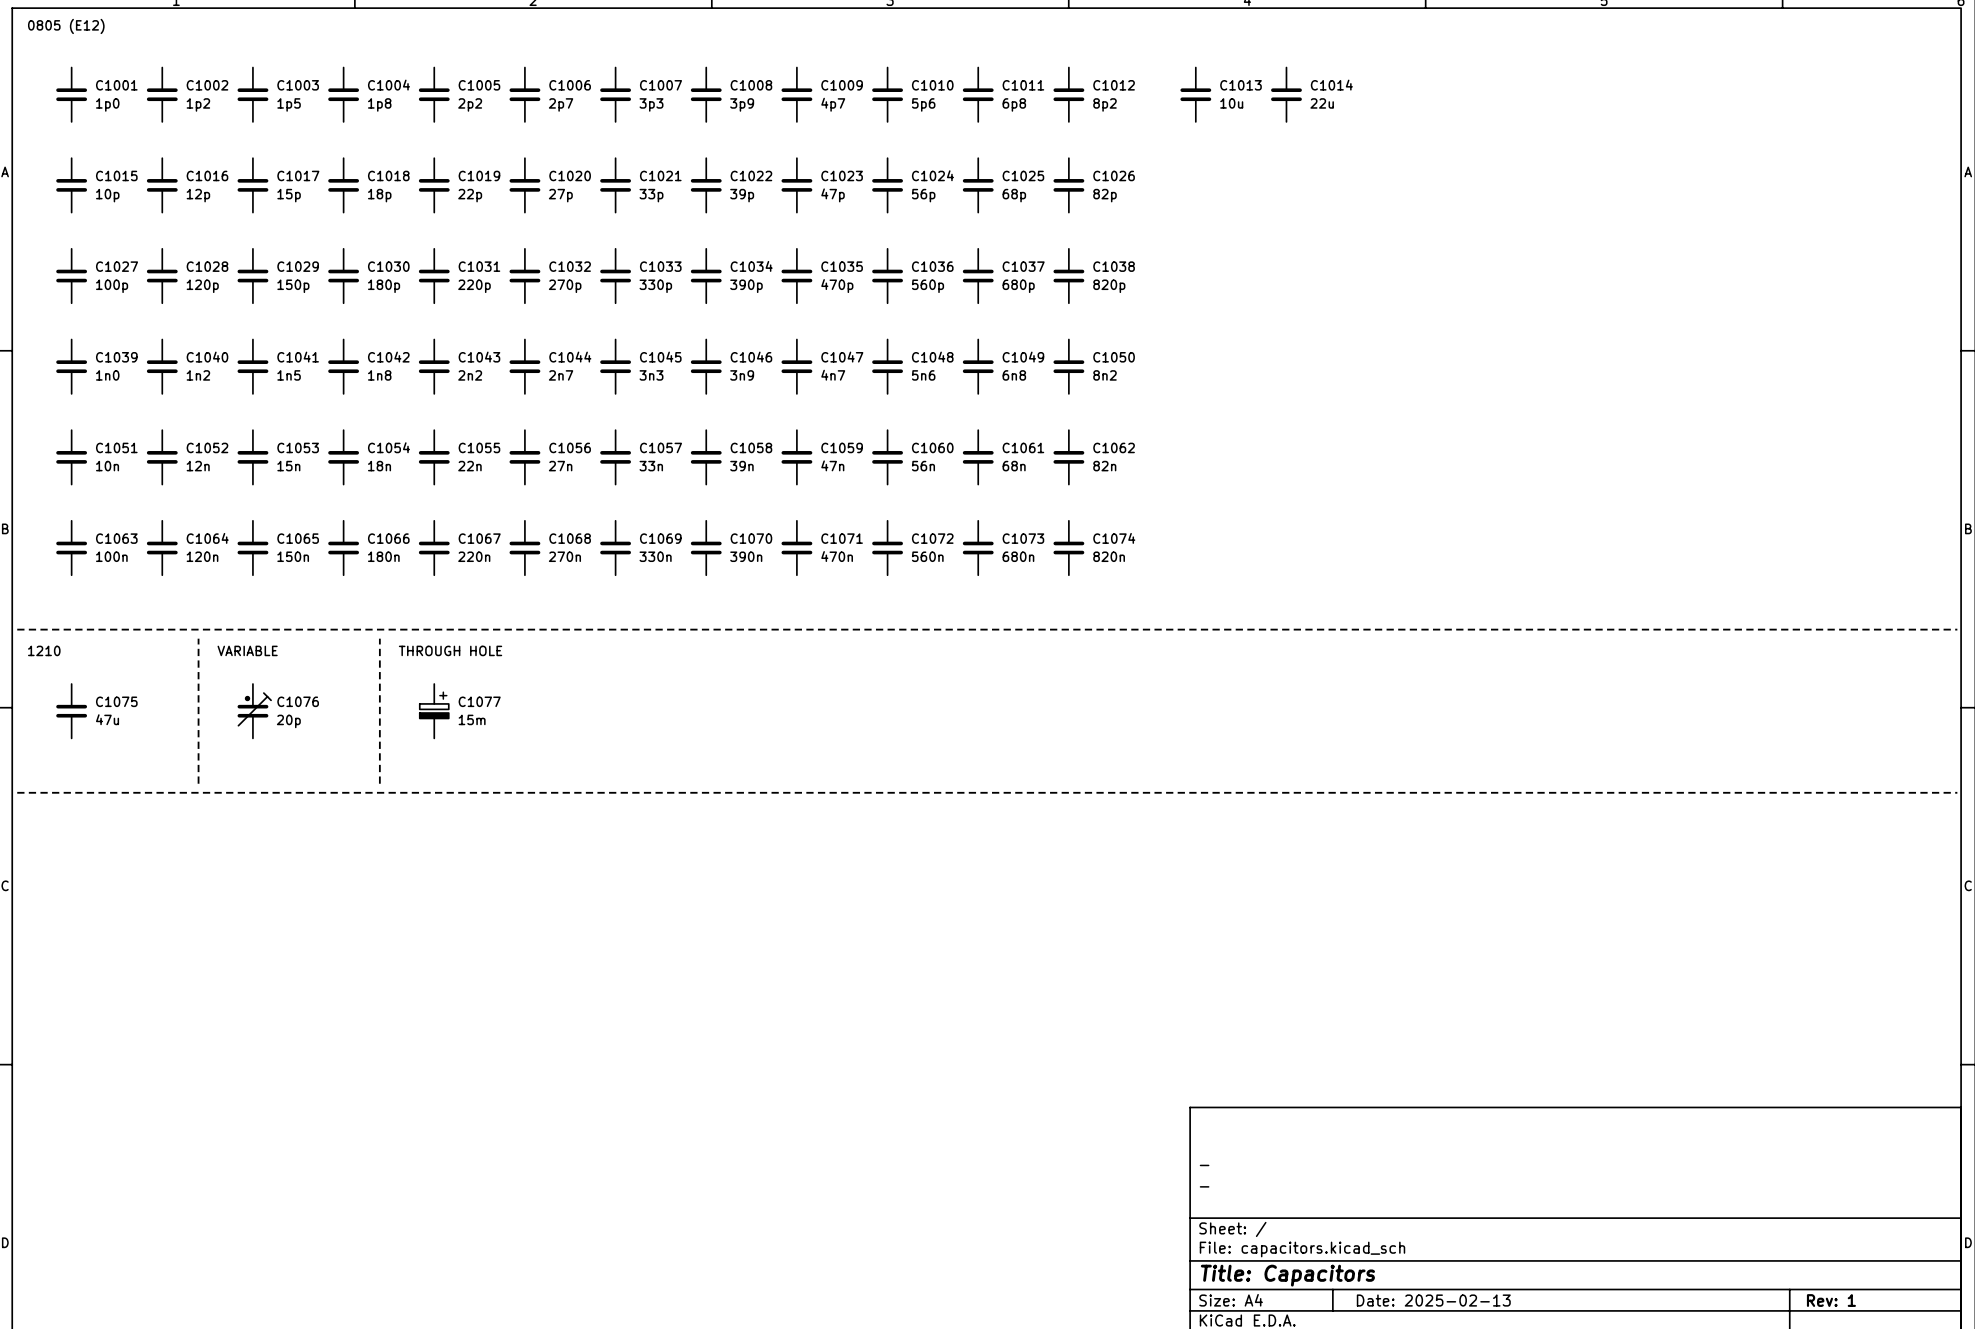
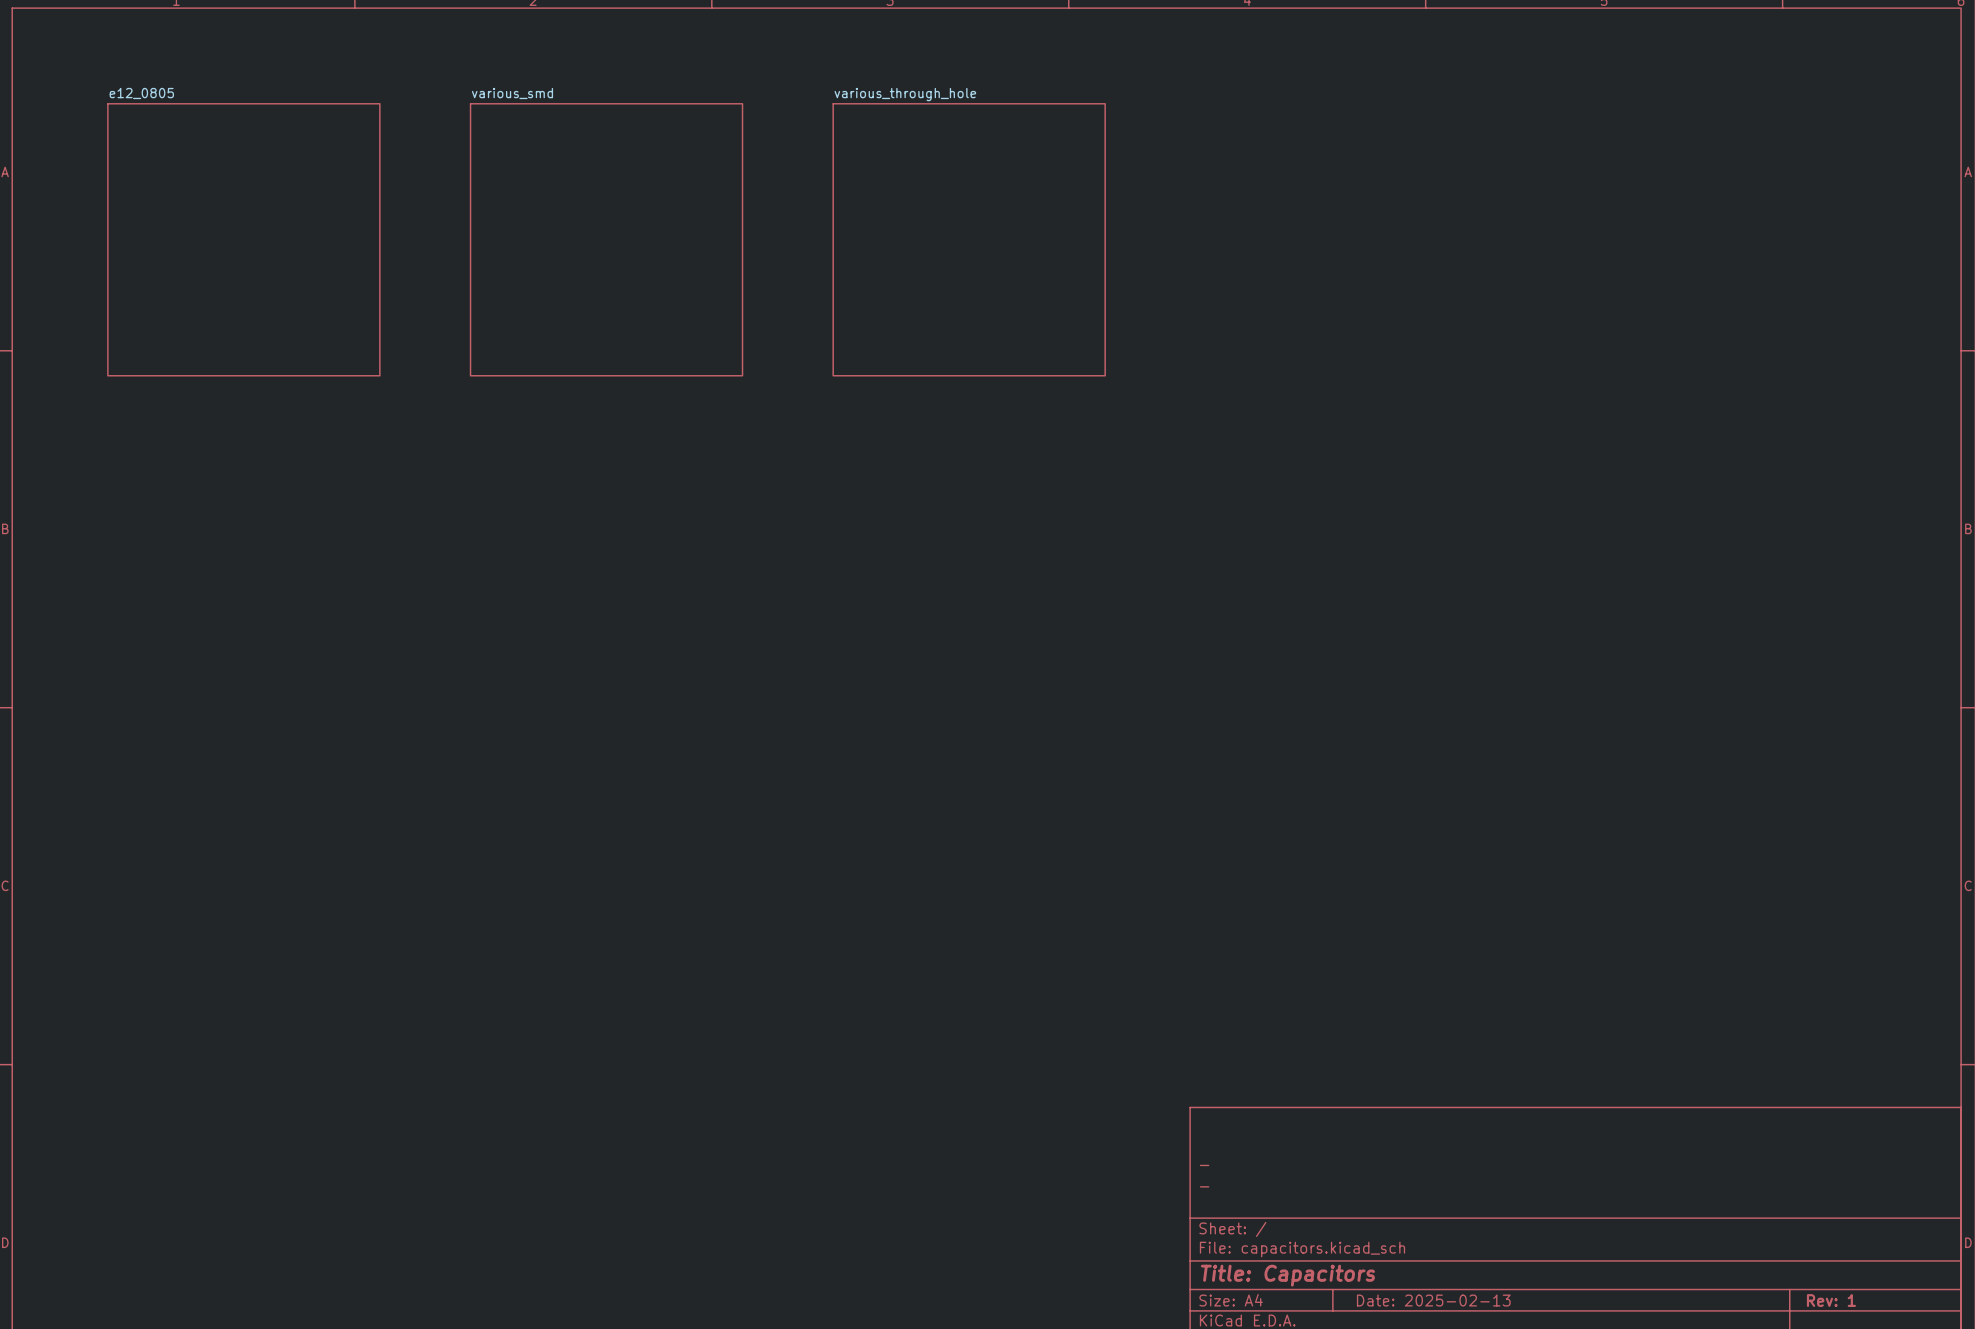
text: 0805 (E12) (66, 26) -> none
C1001: 1p0 (71, 94) -> none
C1002: 1p2 (162, 94) -> none
C1003: 1p5 (252, 94) -> none
C1004: 1p8 (343, 94) -> none
C1005: 2p2 (434, 94) -> none
C1006: 2p7 (524, 94) -> none
C1007: 3p3 (615, 94) -> none
C1008: 3p9 (706, 94) -> none
C1009: 4p7 (796, 94) -> none
C1010: 5p6 (887, 94) -> none
C1011: 6p8 (978, 94) -> none
C1012: 8p2 (1068, 94) -> none
C1013: 10u (1195, 94) -> none
C1014: 22u (1286, 94) -> none
C1015: 10p (71, 185) -> none
C1016: 12p (162, 185) -> none
C1017: 15p (252, 185) -> none
C1018: 18p (343, 185) -> none
C1019: 22p (434, 185) -> none
C1020: 27p (524, 185) -> none
C1021: 33p (615, 185) -> none
C1022: 39p (706, 185) -> none
C1023: 47p (796, 185) -> none
C1024: 56p (887, 185) -> none
C1025: 68p (978, 185) -> none
C1026: 82p (1068, 185) -> none
sheet e12_0805: none -> (243, 239)
sheet various_smd: none -> (606, 239)
sheet various_through_hole: none -> (969, 239)
C1027: 100p (71, 276) -> none
C1028: 120p (162, 276) -> none
C1029: 150p (252, 276) -> none
C1030: 180p (343, 276) -> none
C1031: 220p (434, 276) -> none
C1032: 270p (524, 276) -> none
C1033: 330p (615, 276) -> none
C1034: 390p (706, 276) -> none
C1035: 470p (796, 276) -> none
C1036: 560p (887, 276) -> none
C1037: 680p (978, 276) -> none
C1038: 820p (1068, 276) -> none
C1039: 1n0 (71, 366) -> none
C1040: 1n2 (162, 366) -> none
C1041: 1n5 (252, 366) -> none
C1042: 1n8 (343, 366) -> none
C1043: 2n2 (434, 366) -> none
C1044: 2n7 (524, 366) -> none
C1045: 3n3 (615, 366) -> none
C1046: 3n9 (706, 366) -> none
C1047: 4n7 (796, 366) -> none
C1048: 5n6 (887, 366) -> none
C1049: 6n8 (978, 366) -> none
C1050: 8n2 (1068, 366) -> none
C1051: 10n (71, 457) -> none
C1052: 12n (162, 457) -> none
C1053: 15n (252, 457) -> none
C1054: 18n (343, 457) -> none
C1055: 22n (434, 457) -> none
C1056: 27n (524, 457) -> none
C1057: 33n (615, 457) -> none
C1058: 39n (706, 457) -> none
C1059: 47n (796, 457) -> none
C1060: 56n (887, 457) -> none
C1061: 68n (978, 457) -> none
C1062: 82n (1068, 457) -> none
C1063: 100n (71, 548) -> none
C1064: 120n (162, 548) -> none
C1065: 150n (252, 548) -> none
C1066: 180n (343, 548) -> none
C1067: 220n (434, 548) -> none
C1068: 270n (524, 548) -> none
C1069: 330n (615, 548) -> none
C1070: 390n (706, 548) -> none
C1071: 470n (796, 548) -> none
C1072: 560n (887, 548) -> none
C1073: 680n (978, 548) -> none
C1074: 820n (1068, 548) -> none
line: (17, 629) (1957, 629) -> none
line: (198, 638) (198, 783) -> none
line: (379, 638) (379, 783) -> none
text: 1210 (44, 650) -> none
text: VARIABLE (247, 650) -> none
text: THROUGH HOLE (450, 650) -> none
C1075: 47u (71, 711) -> none
C1076: 20p (254, 711) -> none
C1077: 15m (434, 711) -> none
line: (17, 792) (1957, 792) -> none

